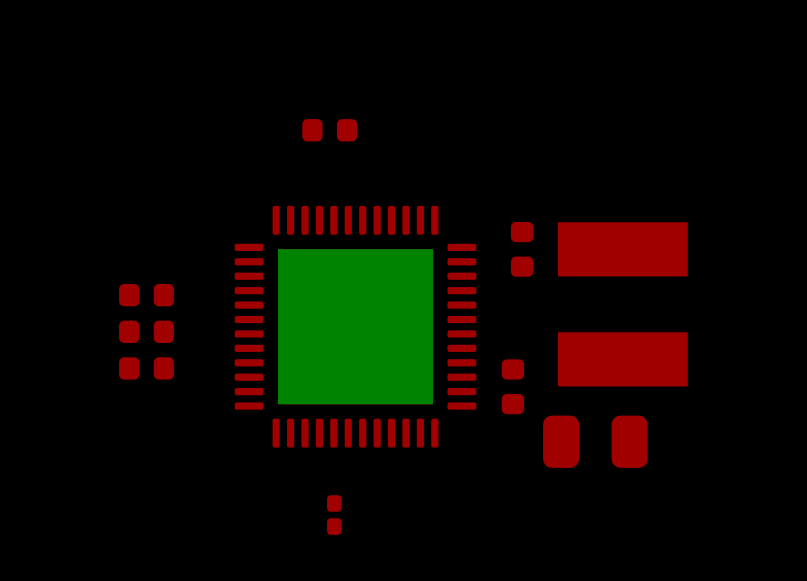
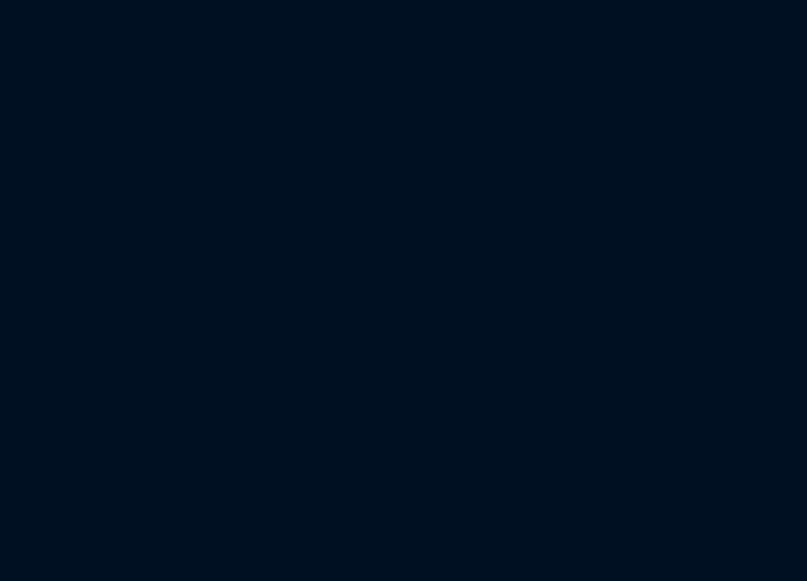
part: (329, 130) -> none
part: (522, 249) -> none
part: (146, 295) -> none
part: (622, 304) -> none
part: (355, 326) -> none
part: (146, 331) -> none
part: (146, 368) -> none
part: (512, 386) -> none
part: (595, 441) -> none
part: (334, 515) -> none

